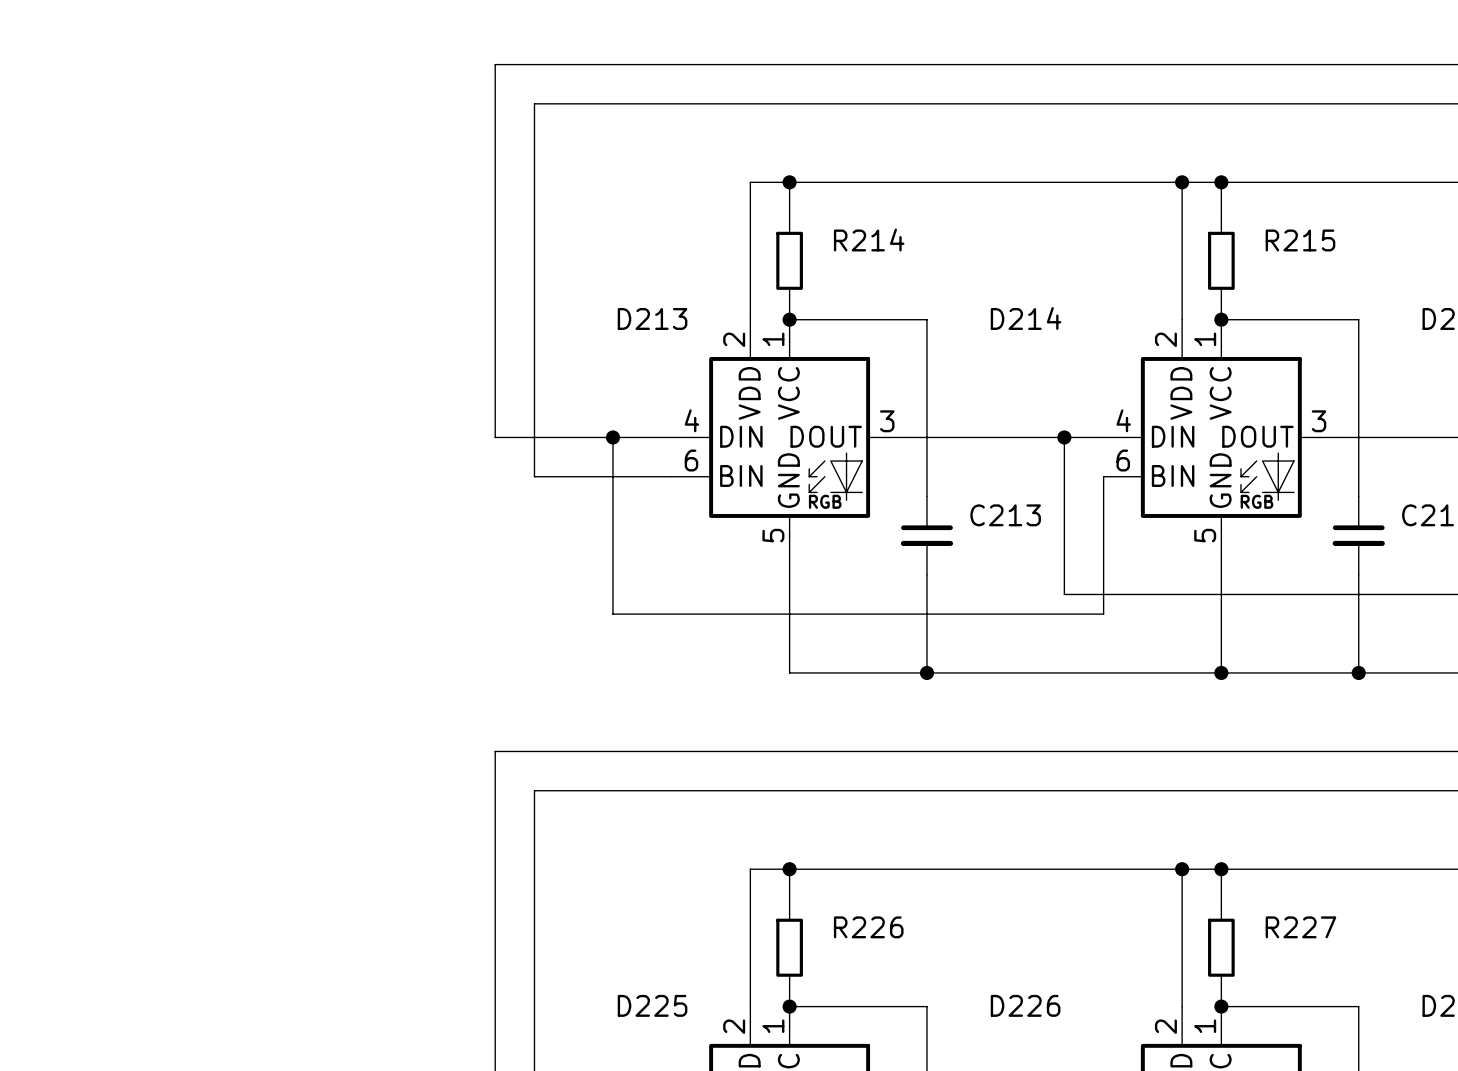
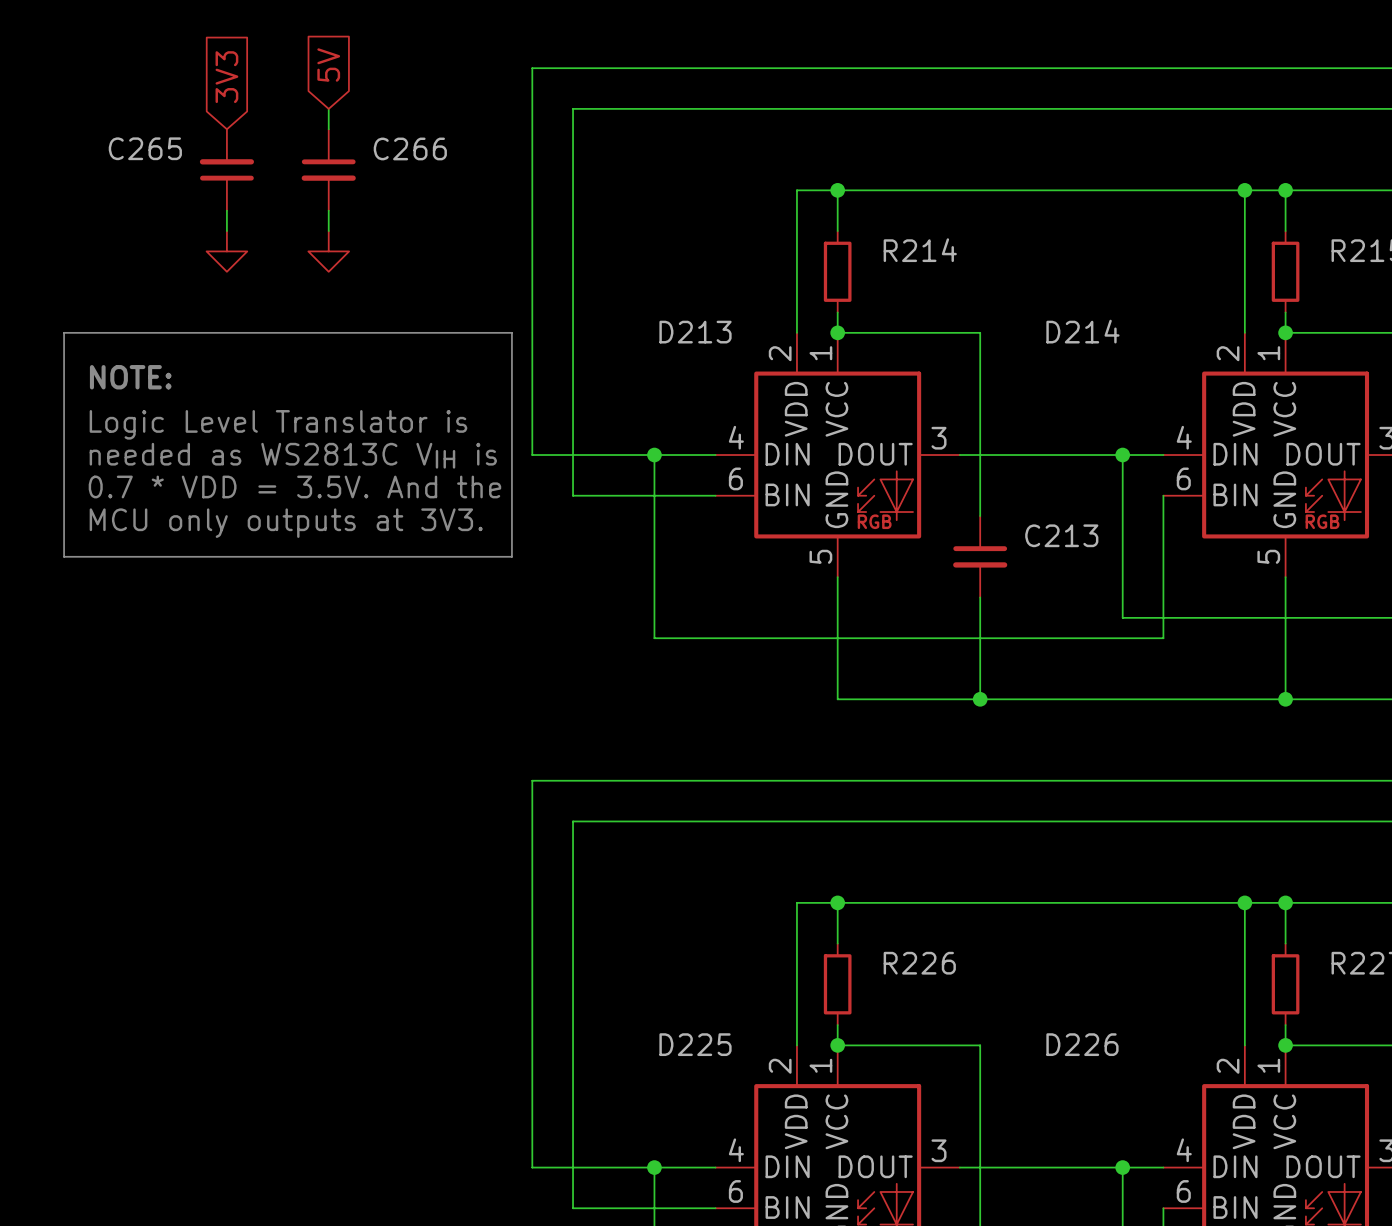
global label: none -> 5V (328, 65)
global label: none -> 3V3 (226, 77)
wire: none -> (328, 108) (328, 129)
C265: none -> (226, 169)
C266: none -> (328, 169)
wire: none -> (226, 210) (226, 231)
wire: none -> (328, 210) (328, 231)
power symbol: none -> (226, 251)
power symbol: none -> (328, 251)
line: none -> (64, 332) (64, 556) (511, 556) (511, 332) (64, 332)
text: none -> NOTE: (130, 377)
text: none -> Logic Level Translator is (278, 424)
text: none -> needed as WS2813C VIH is (293, 455)
text: none -> 0.7 * VDD = 3.5V. And the (294, 486)
text: none -> MCU only outputs at 3V3. (286, 523)

